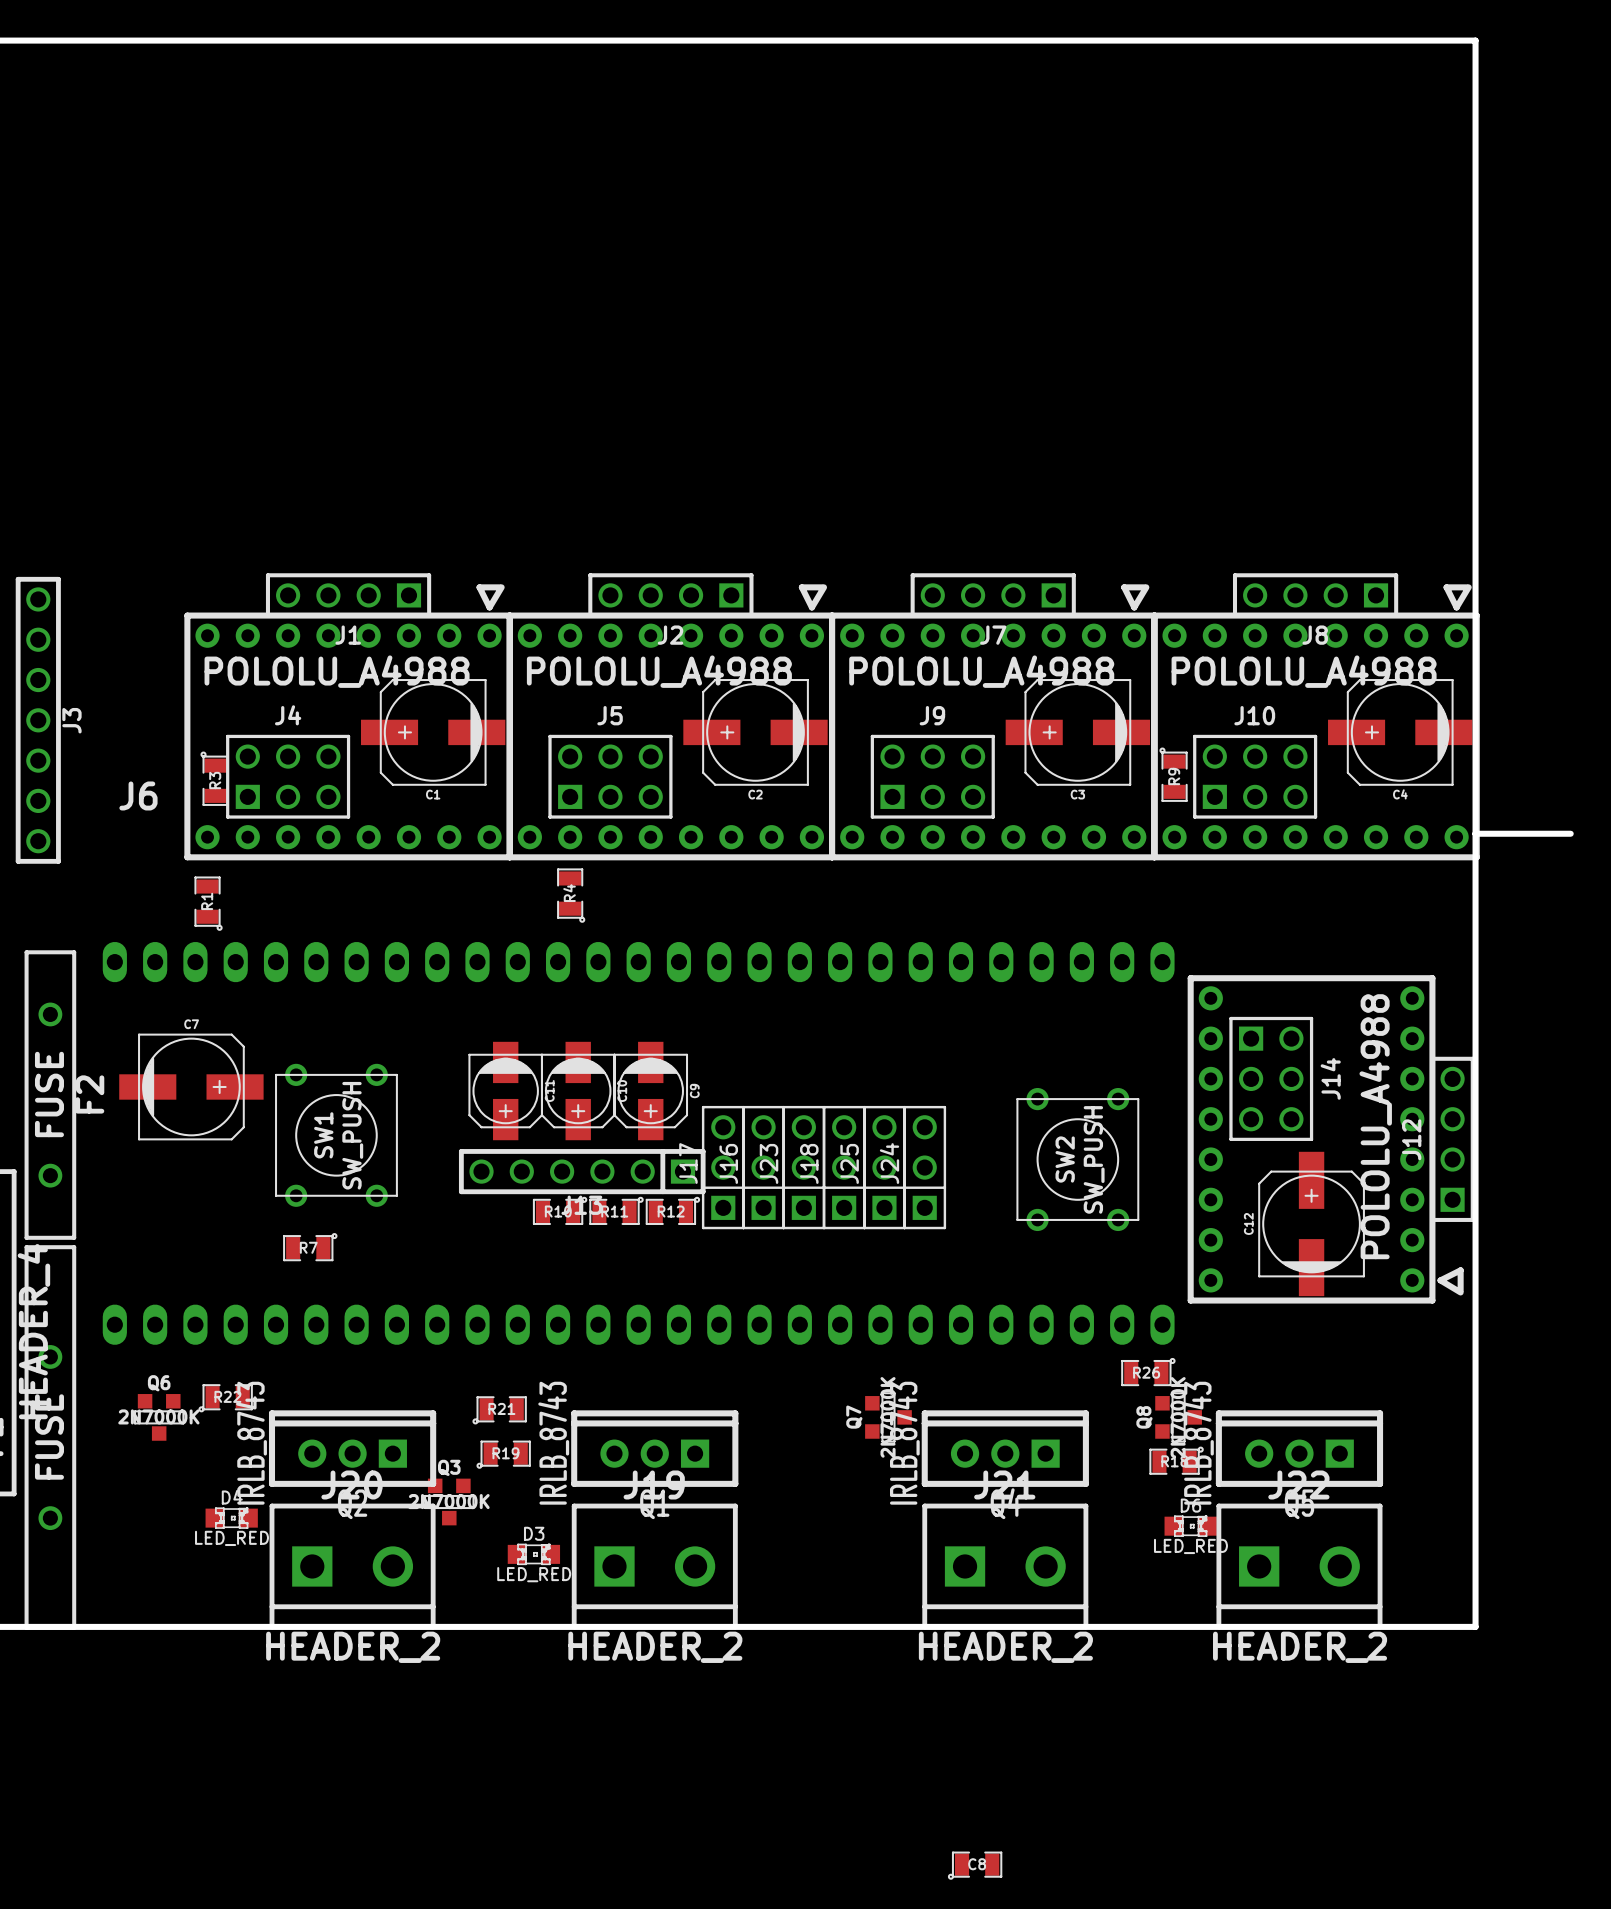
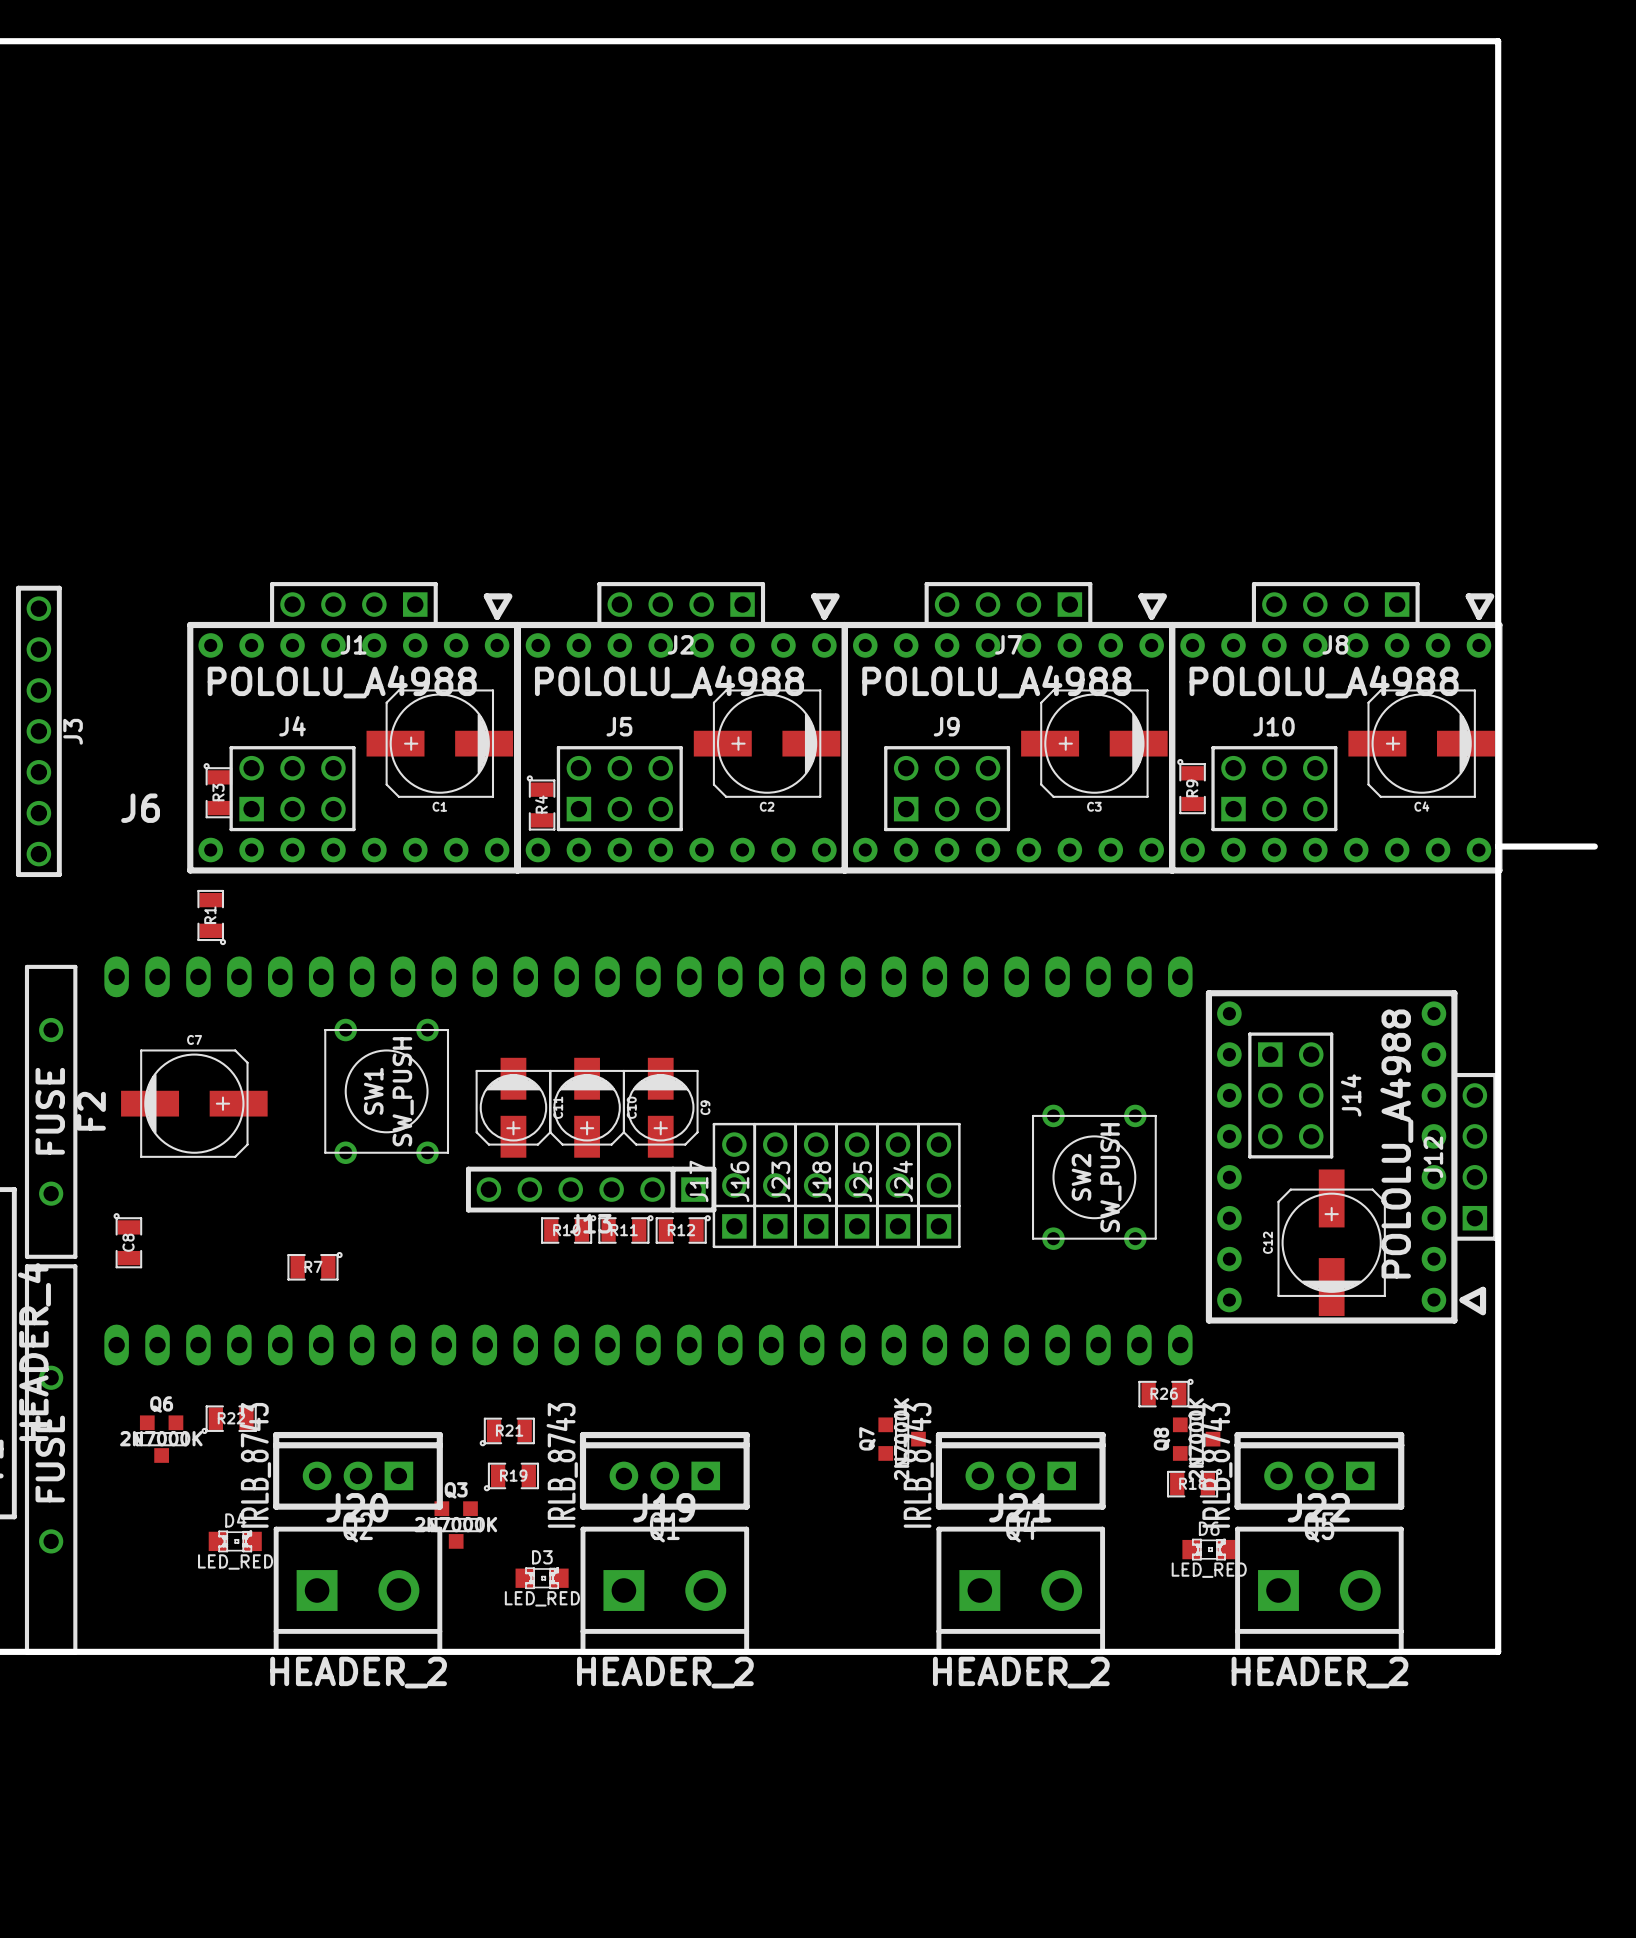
R4 rotation: 0° (571, 895) -> 180° (541, 802)
R4 position: (571, 895) -> (541, 802)
SW1 position: (336, 1135) -> (386, 1091)
C8 rotation: 0° (975, 1865) -> 90° clockwise (127, 1240)
C8 position: (975, 1865) -> (127, 1240)

